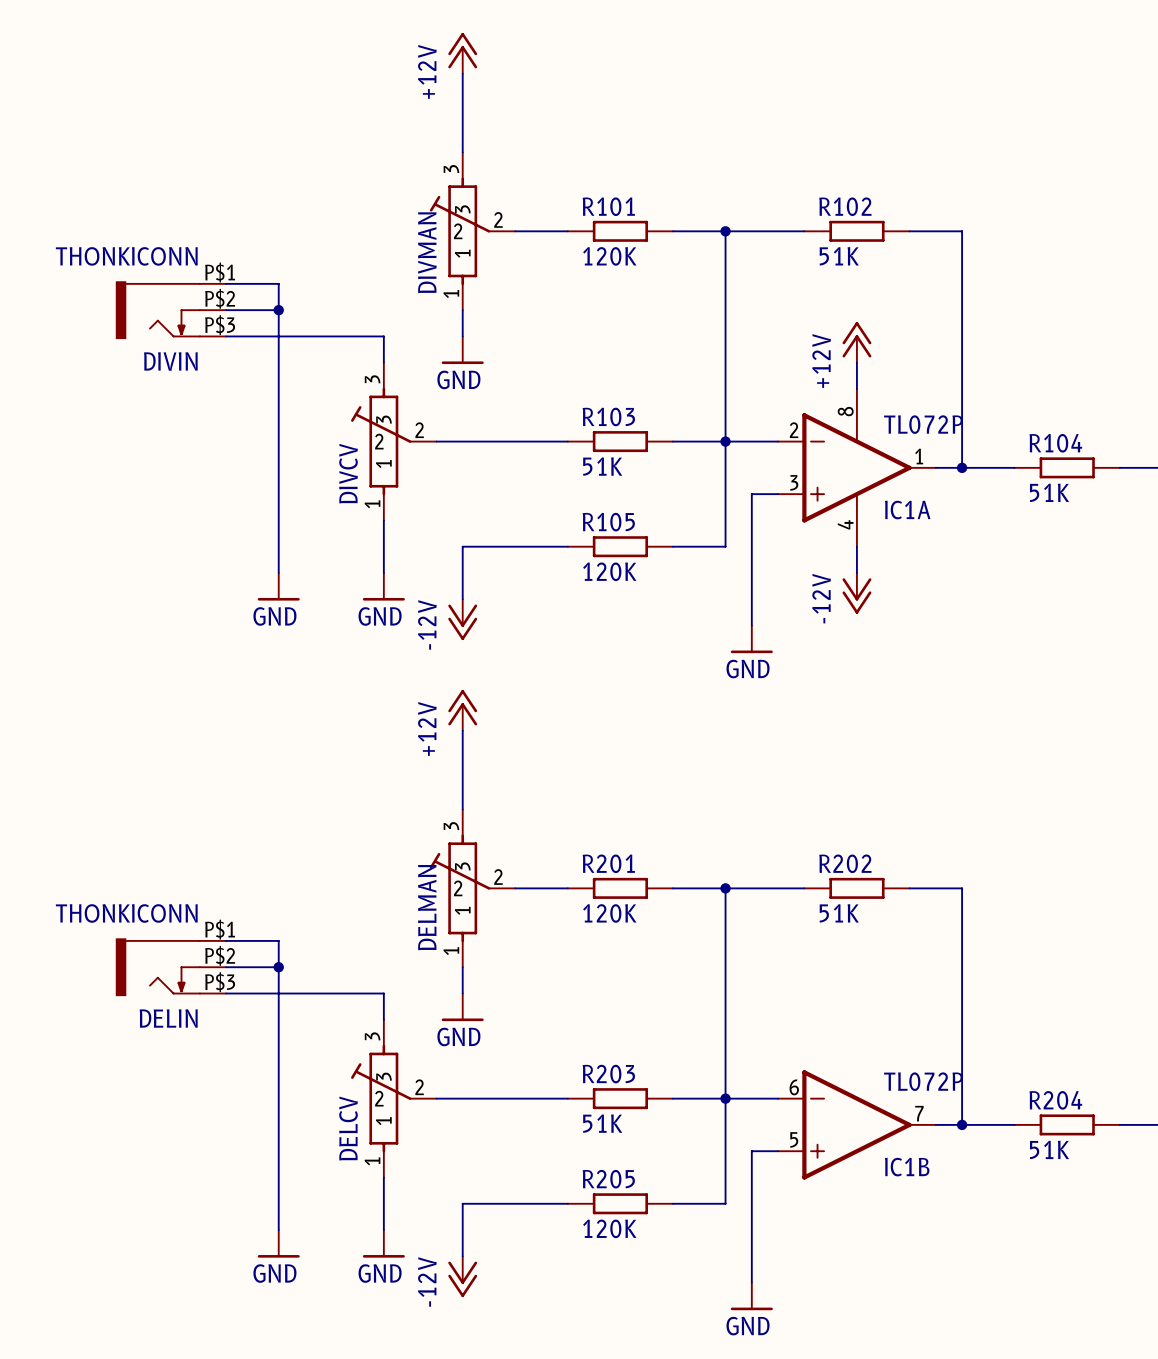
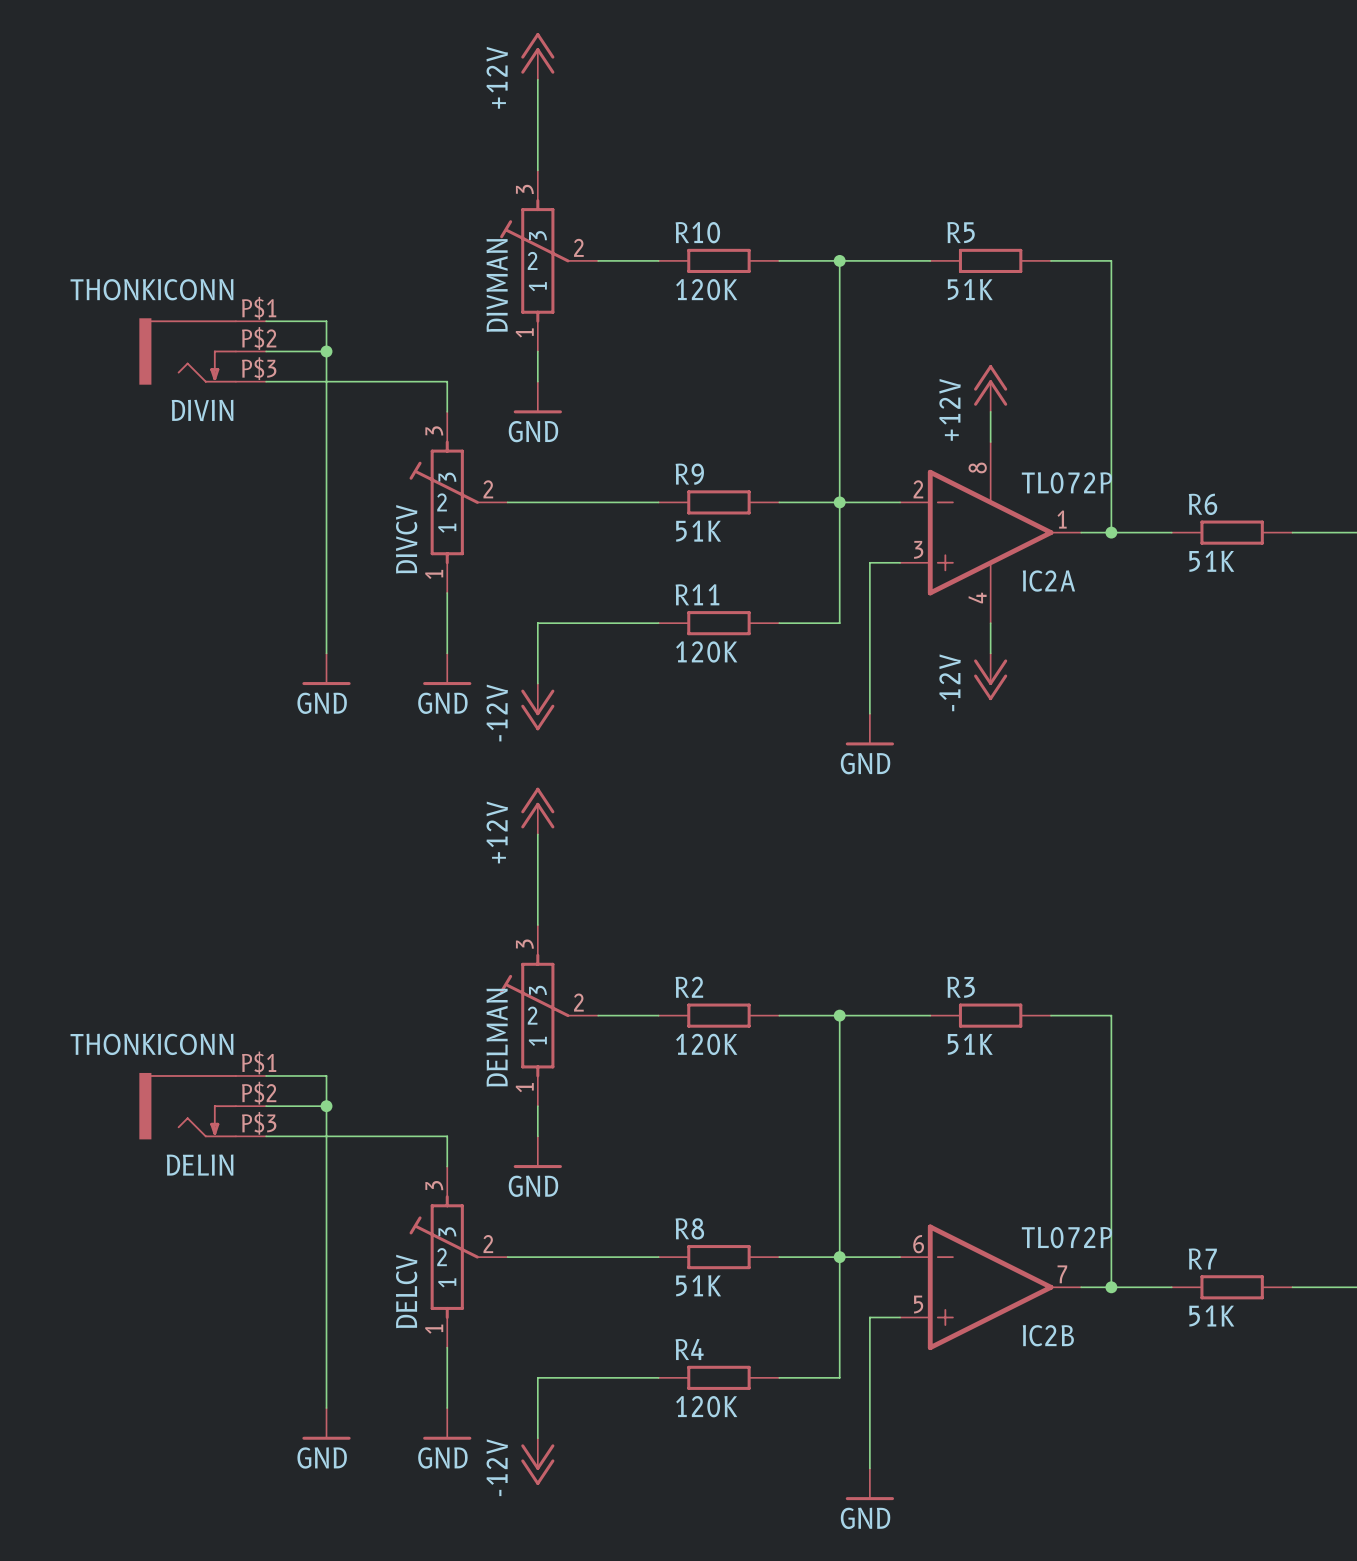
R101 name: R101 (608, 206) -> R10 (697, 232)
R102 name: R102 (845, 206) -> R5 (961, 232)
R103 name: R103 (608, 416) -> R9 (689, 474)
R104 name: R104 (1055, 443) -> R6 (1203, 504)
IC1A name: IC1A (907, 510) -> IC2A (1048, 581)
R105 name: R105 (608, 522) -> R11 (697, 594)
R201 name: R201 (608, 863) -> R2 (689, 987)
R202 name: R202 (845, 863) -> R3 (961, 987)
R203 name: R203 (608, 1074) -> R8 (689, 1228)
R204 name: R204 (1055, 1100) -> R7 (1202, 1258)
IC1B name: IC1B (907, 1167) -> IC2B (1048, 1335)
R205 name: R205 (608, 1179) -> R4 (689, 1349)

